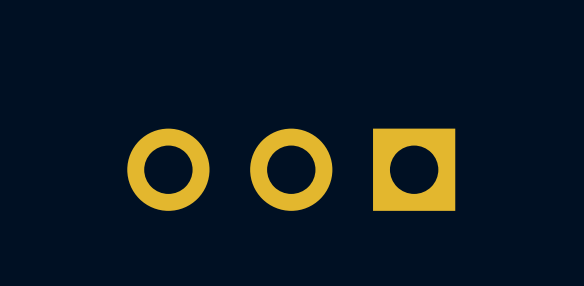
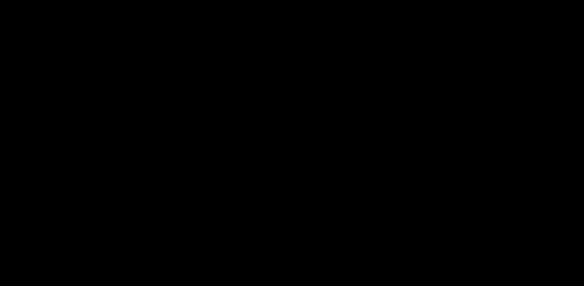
part: (291, 169) -> none

